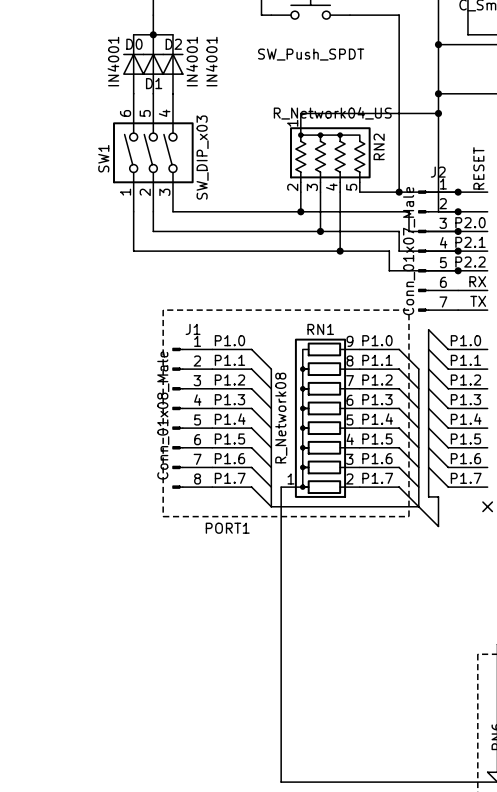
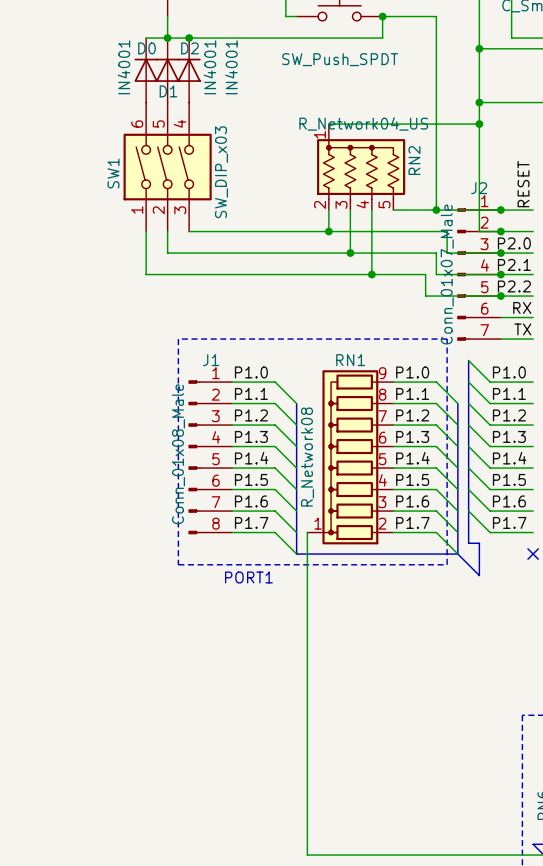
wire: none -> (382, 16) (382, 38) (189, 38)
junction: none -> (382, 16)
junction: none -> (189, 38)

